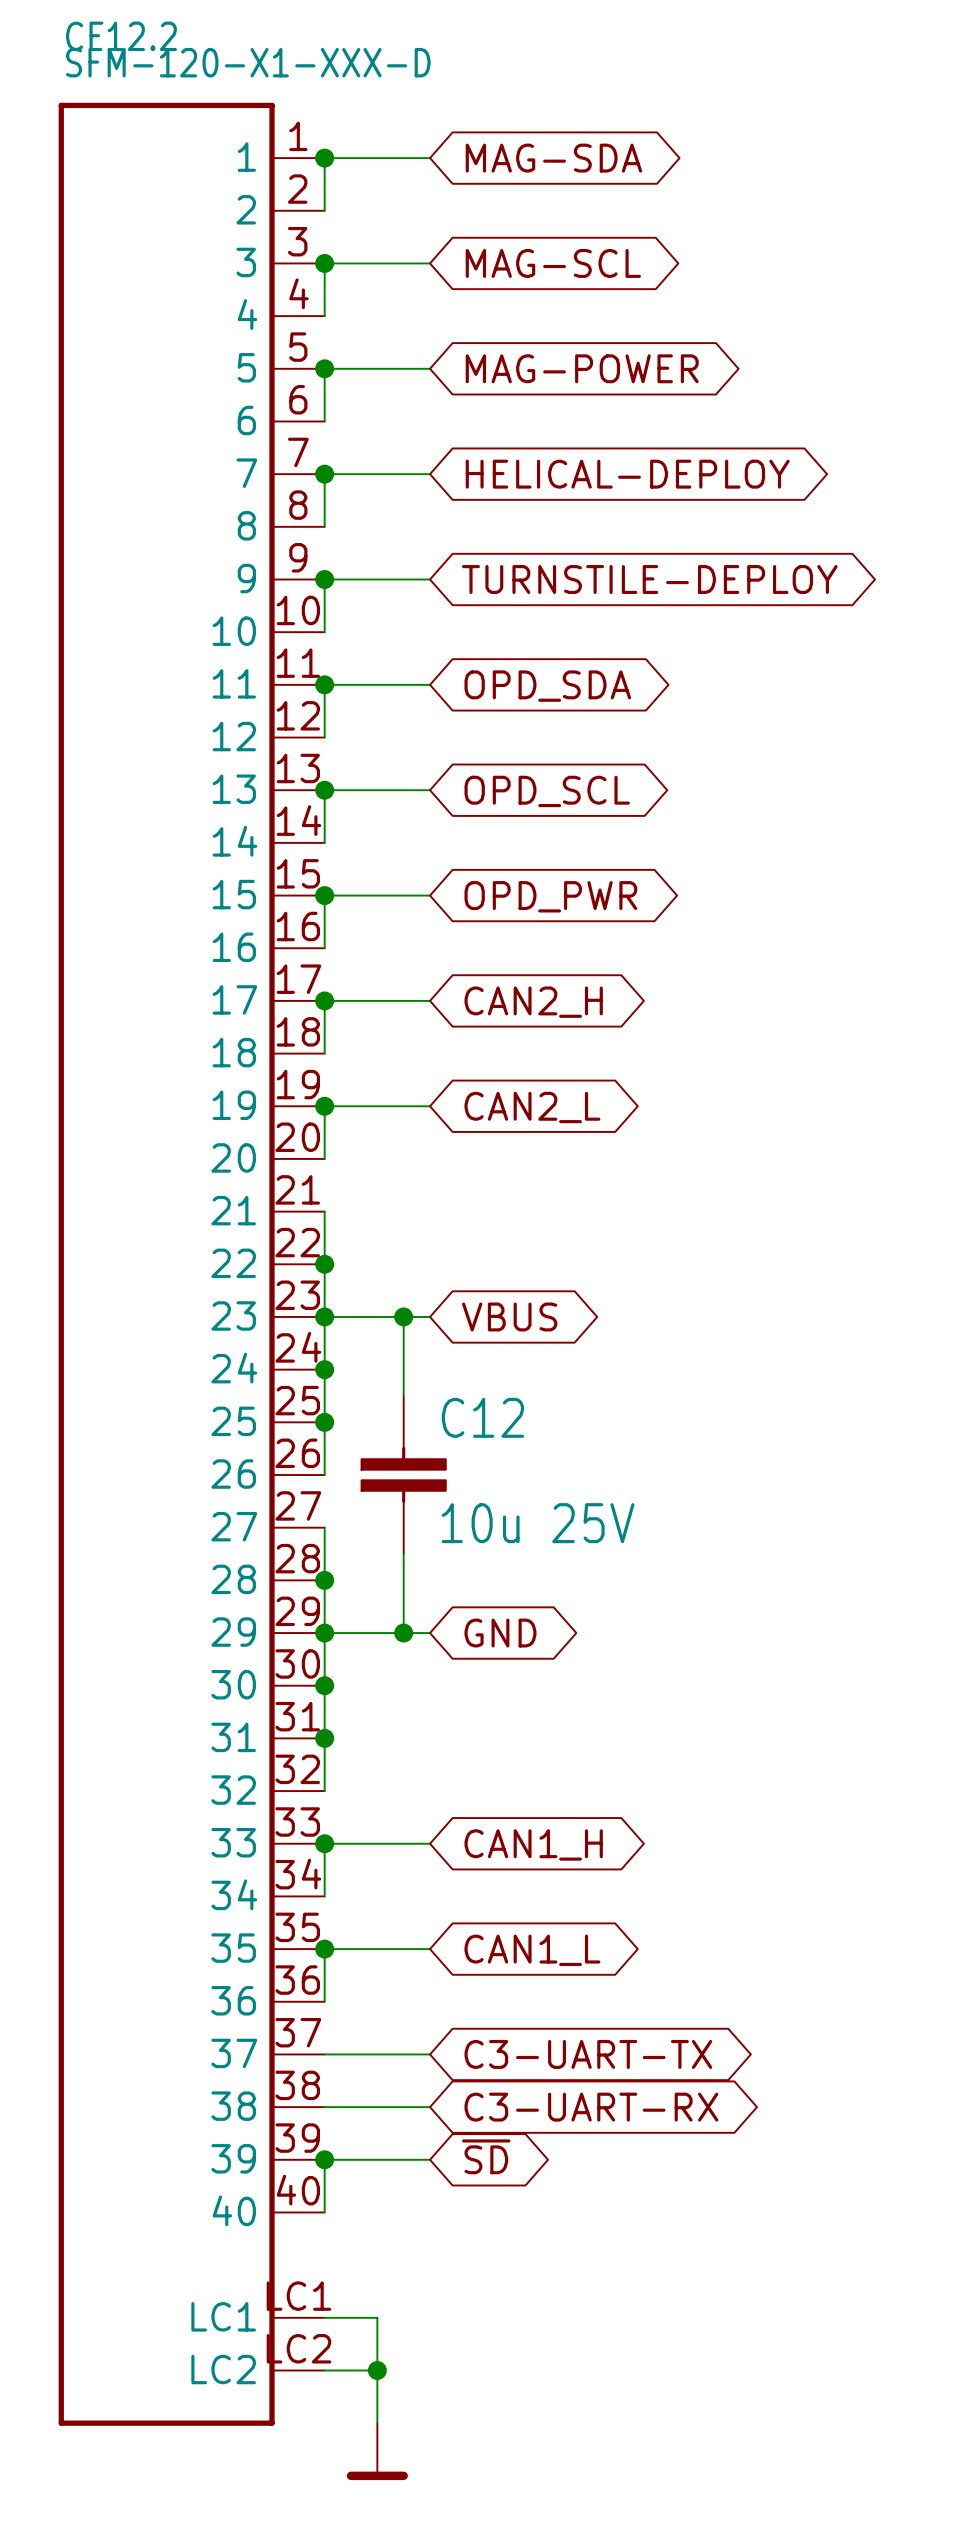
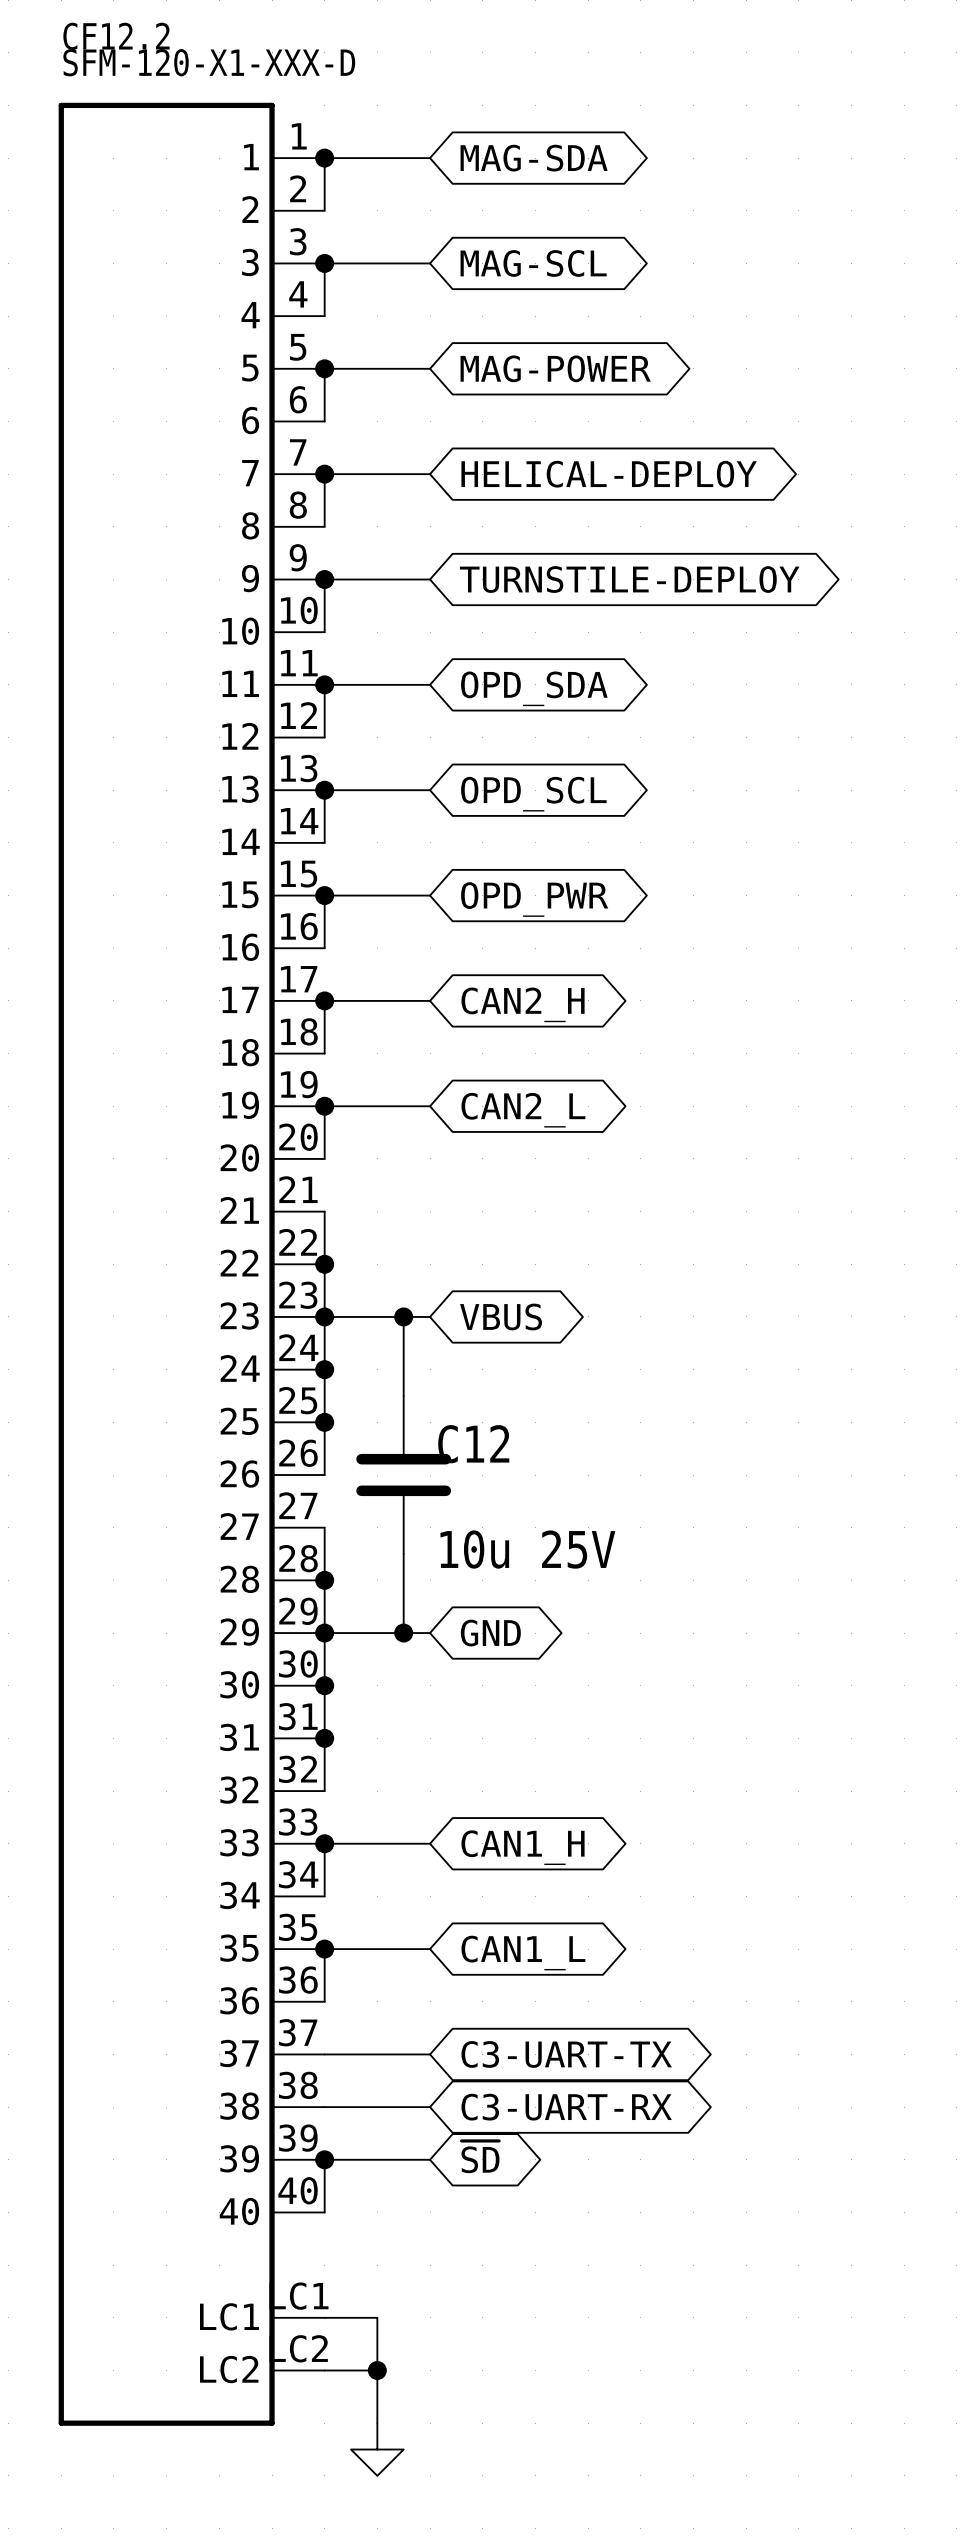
C12 symbol: [361, 1395, 446, 1555] -> [356, 1395, 452, 1555]
C12 name position: C12 (482, 1417) -> C12 (473, 1444)
C12 value position: 10u 25V (538, 1523) -> 10u 25V (527, 1549)
power symbol shape: [346, 2423, 408, 2481] -> [351, 2423, 404, 2476]

